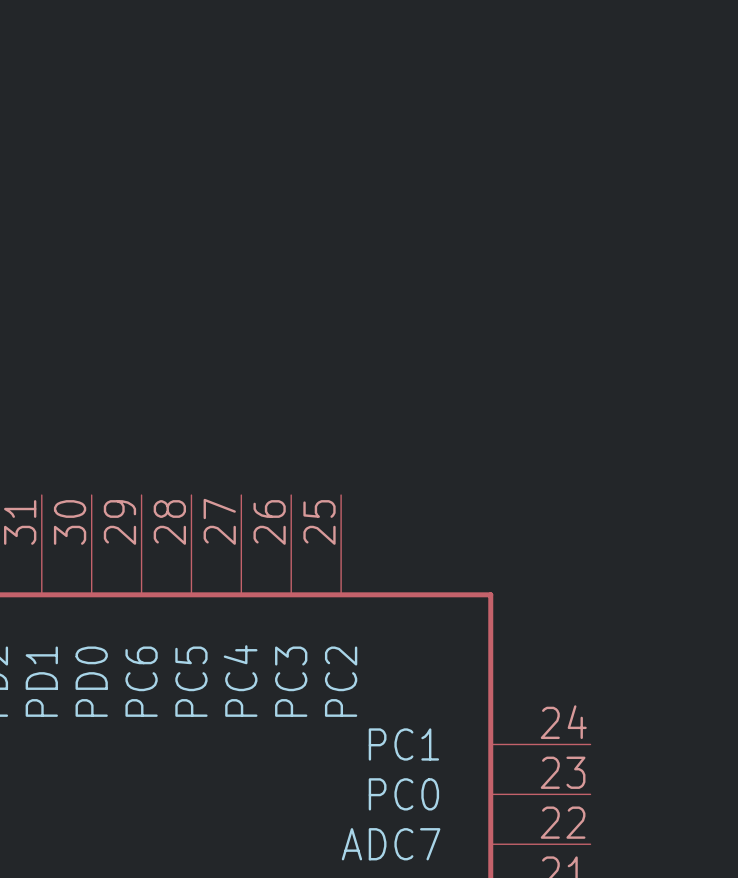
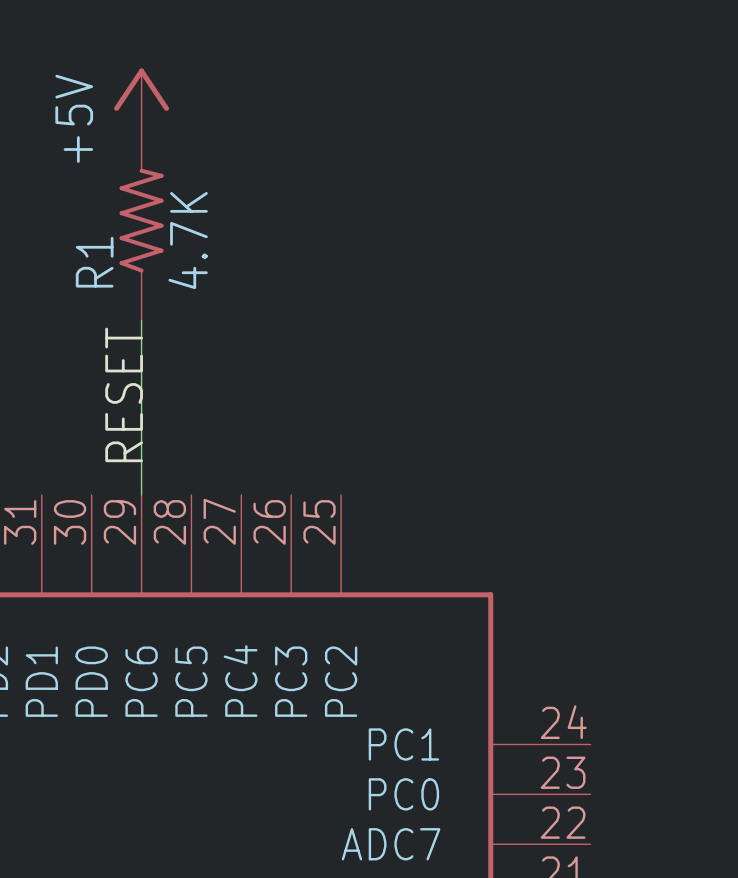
power symbol: none -> +5V (141, 94)
R1: none -> 4.7K (141, 220)
wire: none -> (141, 320) (141, 495)
label: none -> RESET (124, 394)

